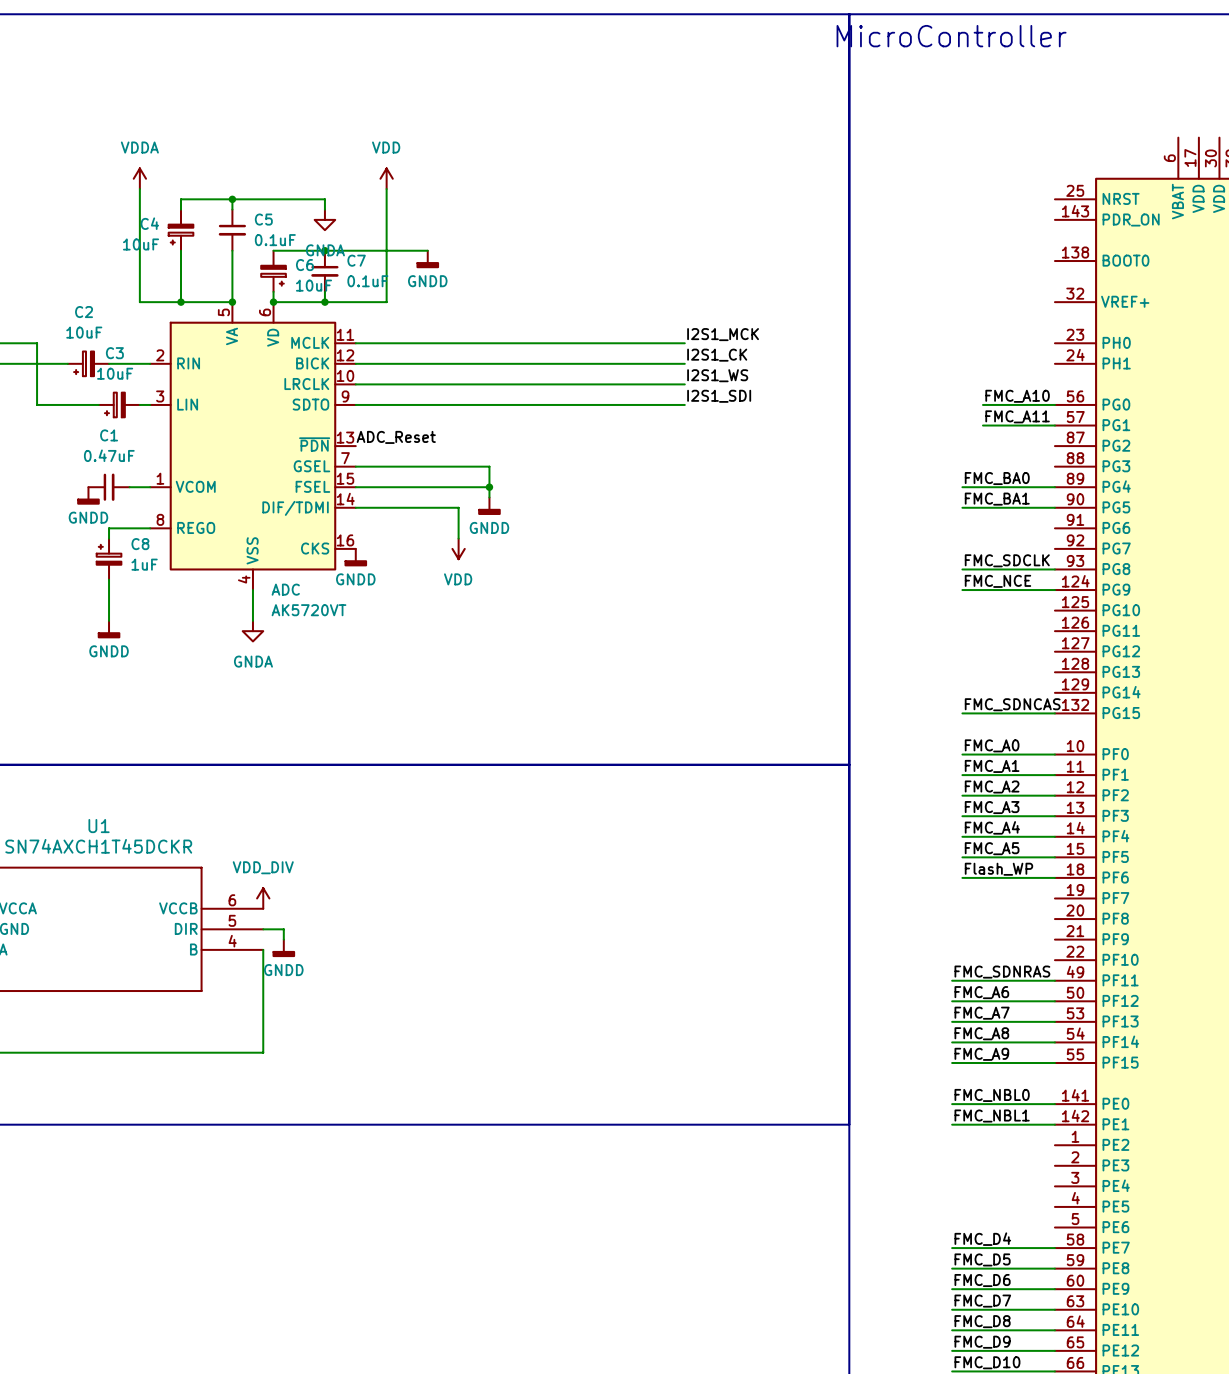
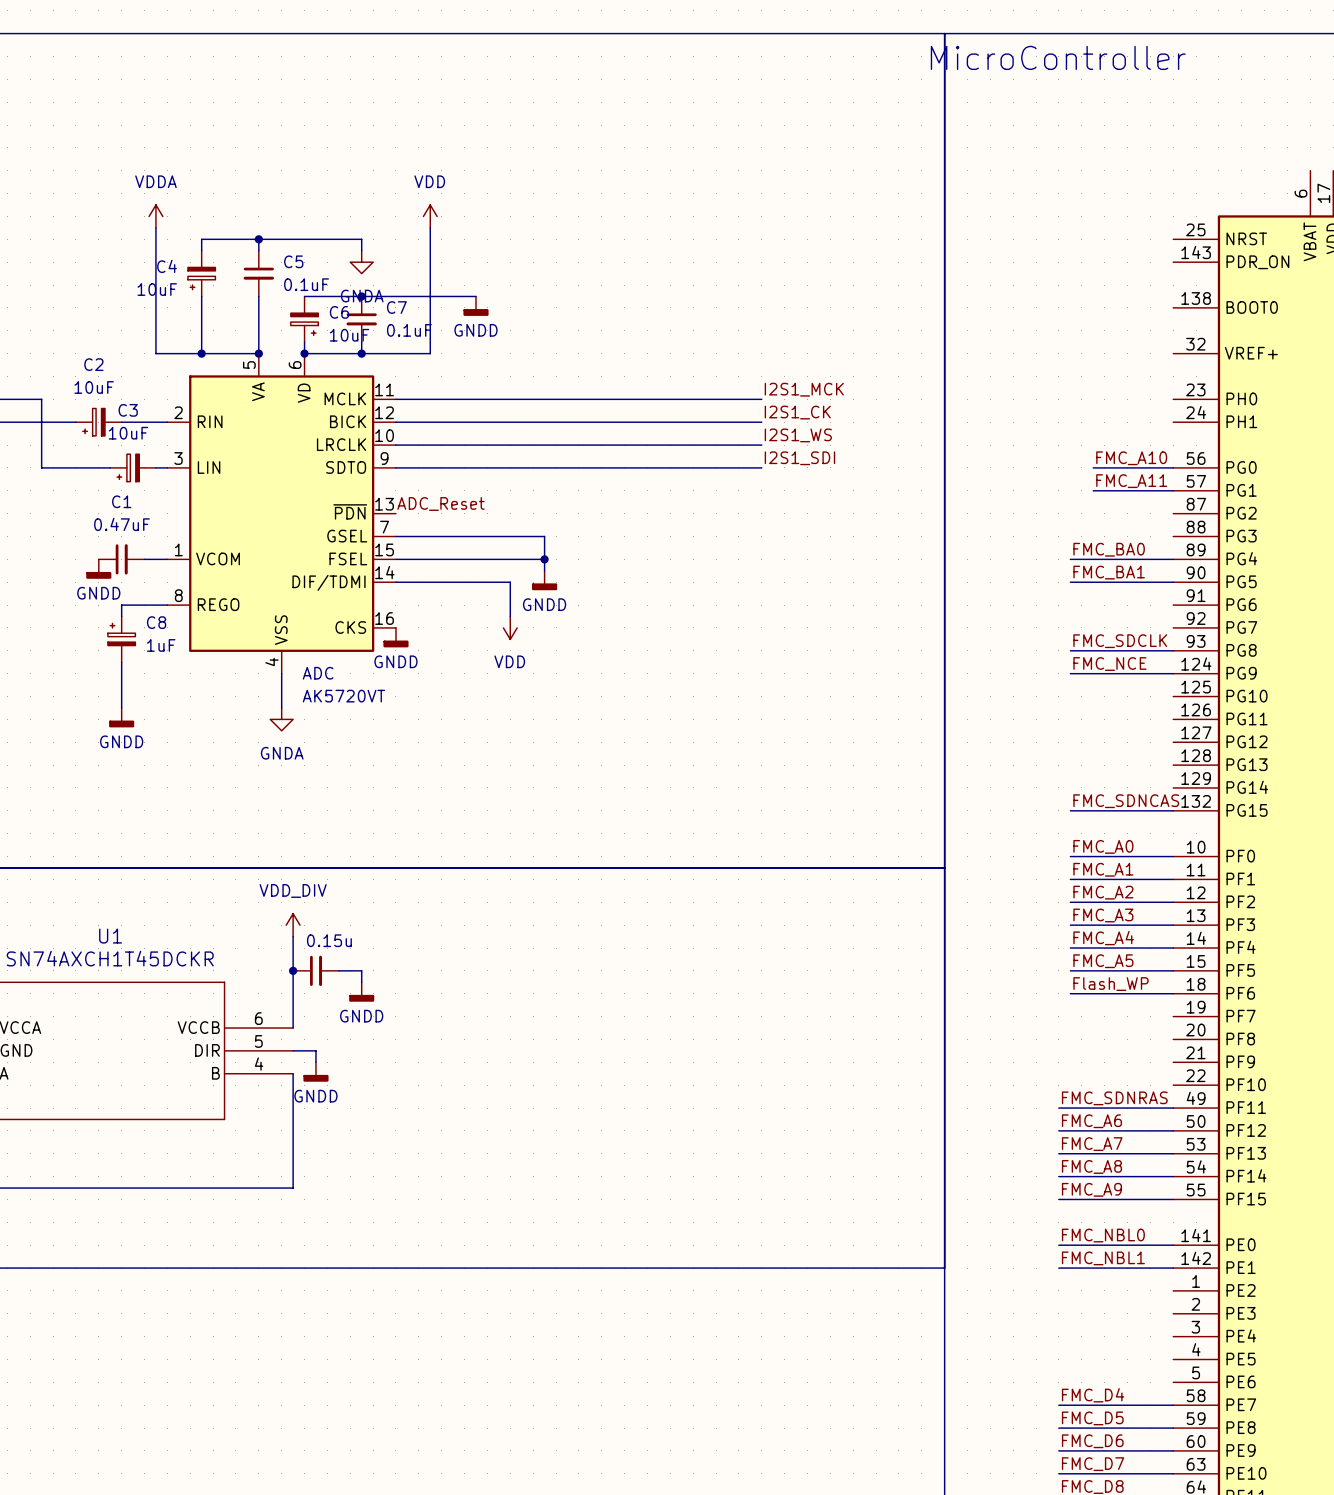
wire: none -> (293, 936) (293, 1028)
junction: none -> (293, 970)
part: none -> 0.15u (315, 970)
wire: none -> (338, 970) (361, 970) (361, 982)
power symbol: none -> GNDD (361, 992)
power symbol position: VDD_DIV (263, 898) -> VDD_DIV (293, 925)

